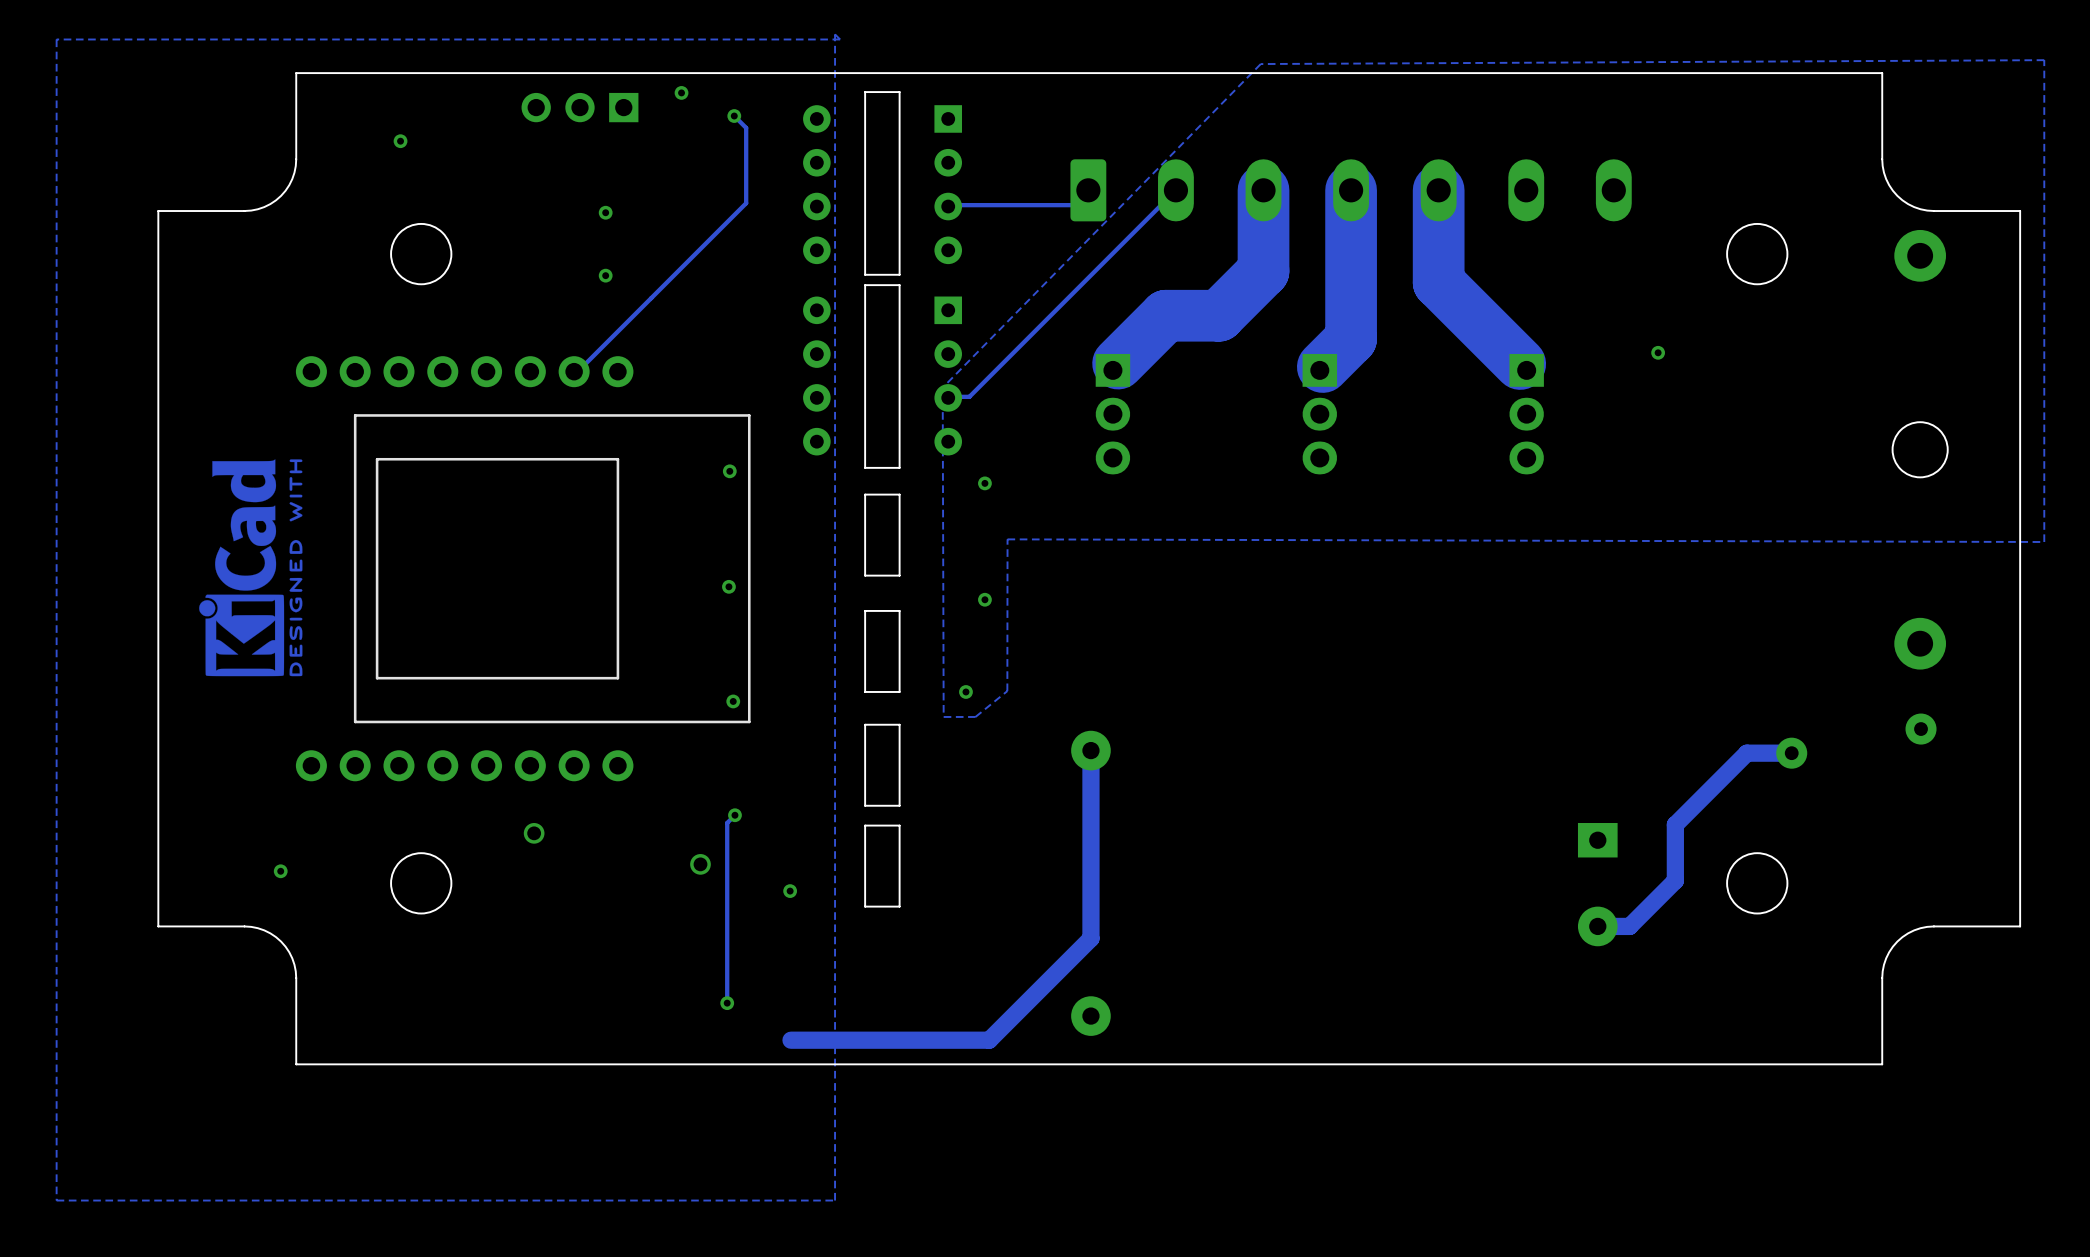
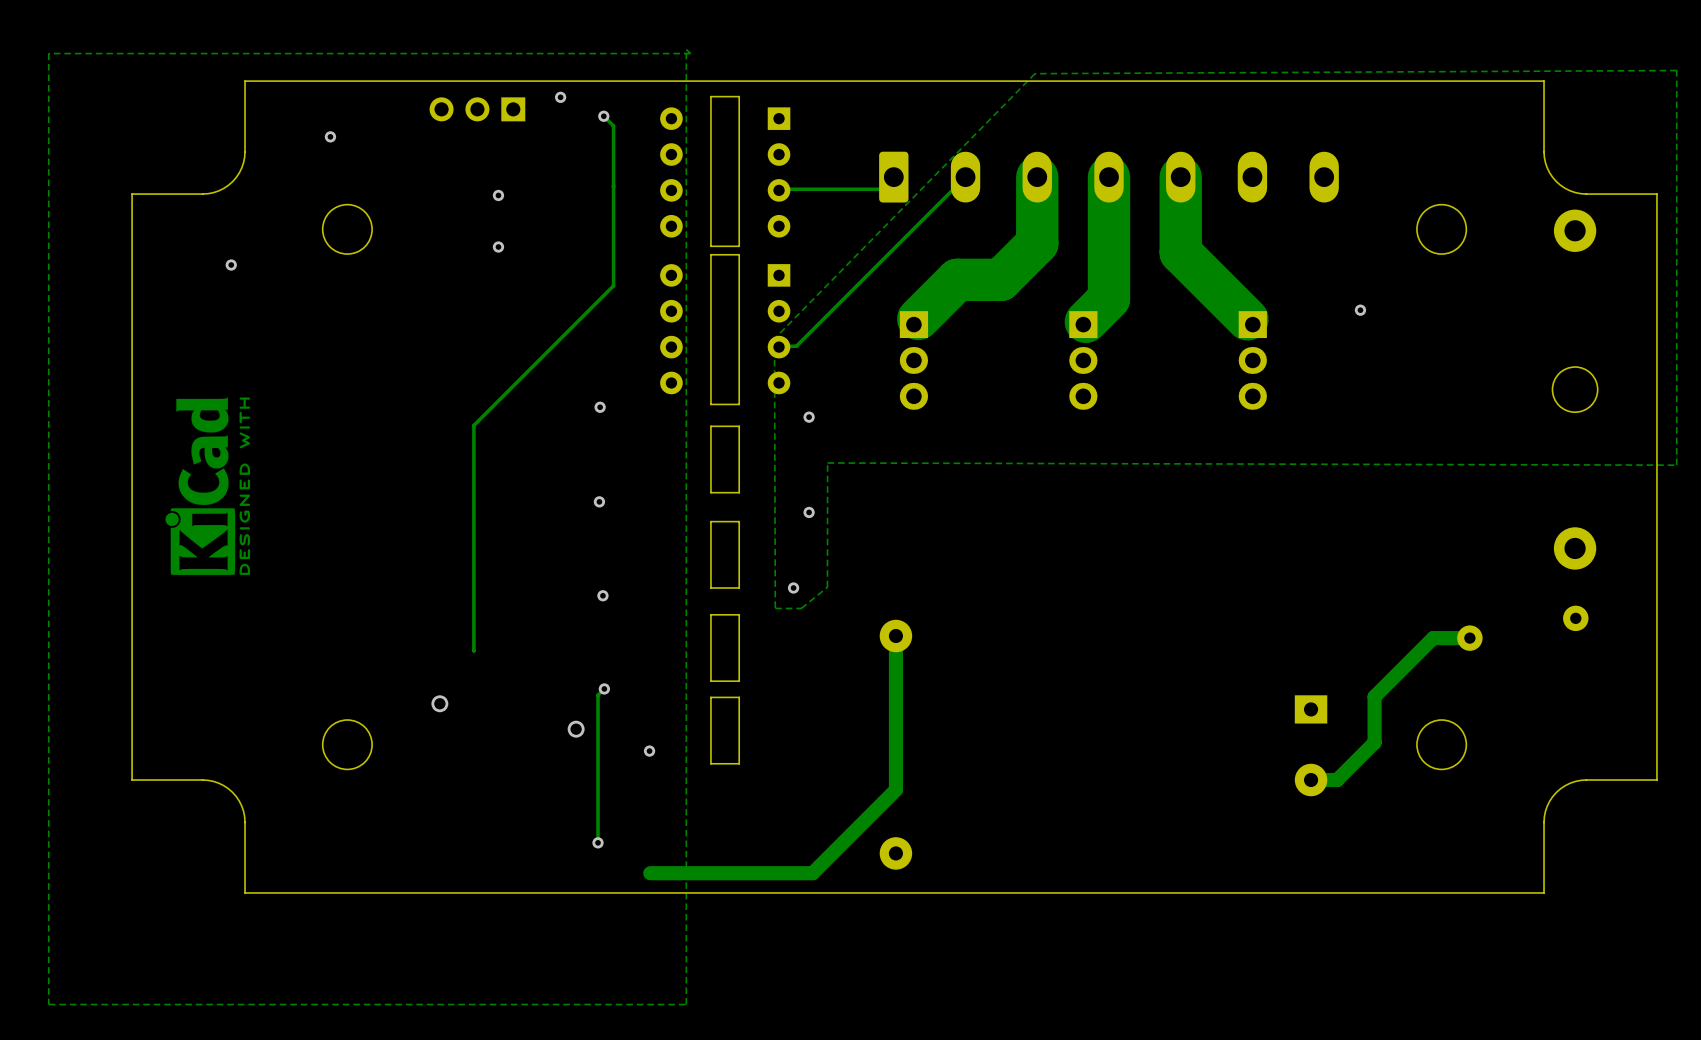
track: (746, 203) (573, 375) -> (613, 187) (613, 285) (473, 425) (473, 650)
via: none -> (231, 265)
part: (523, 568) -> none
via: (280, 871) -> none

